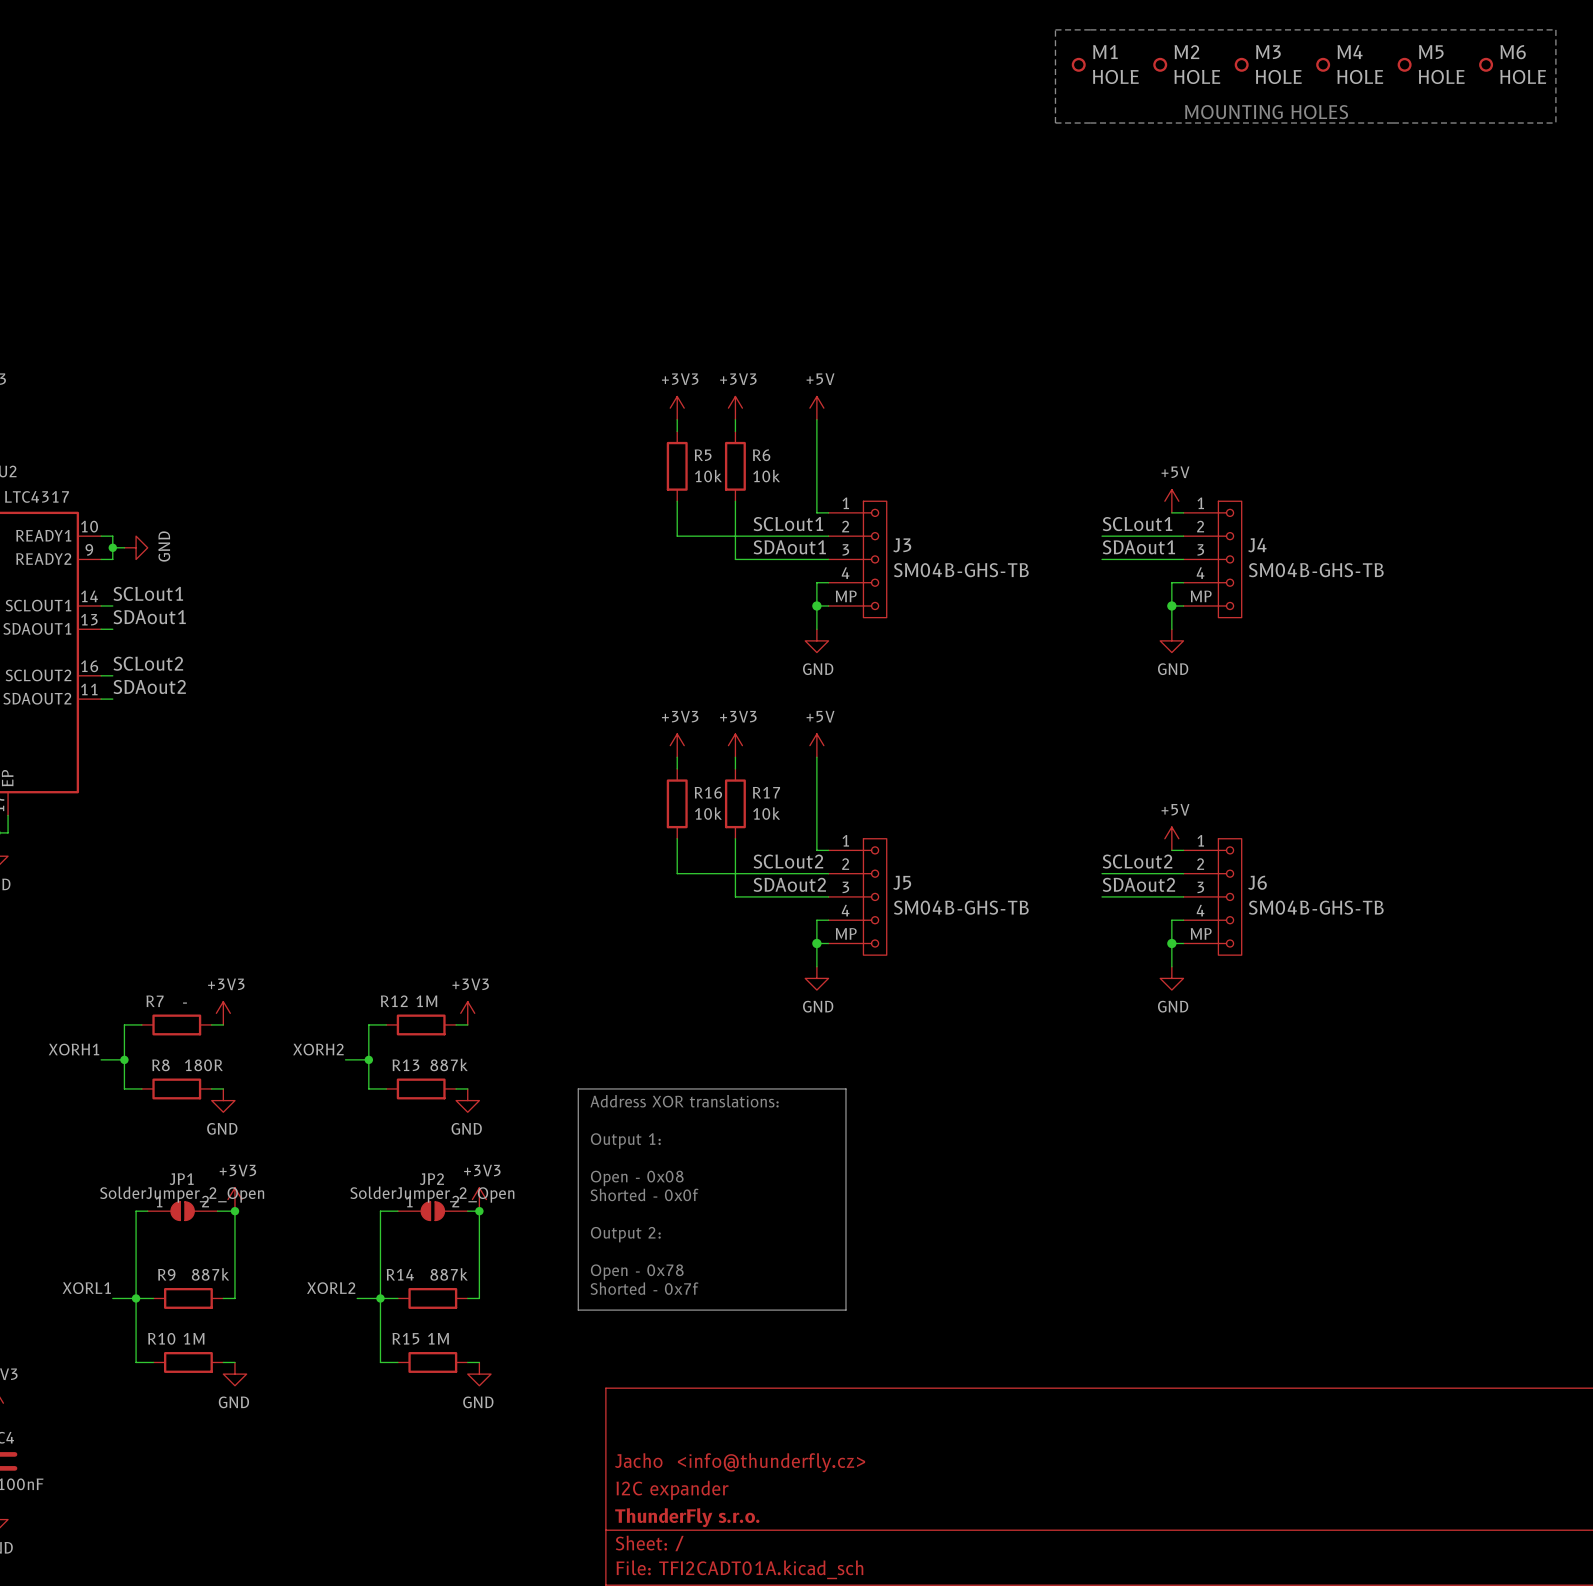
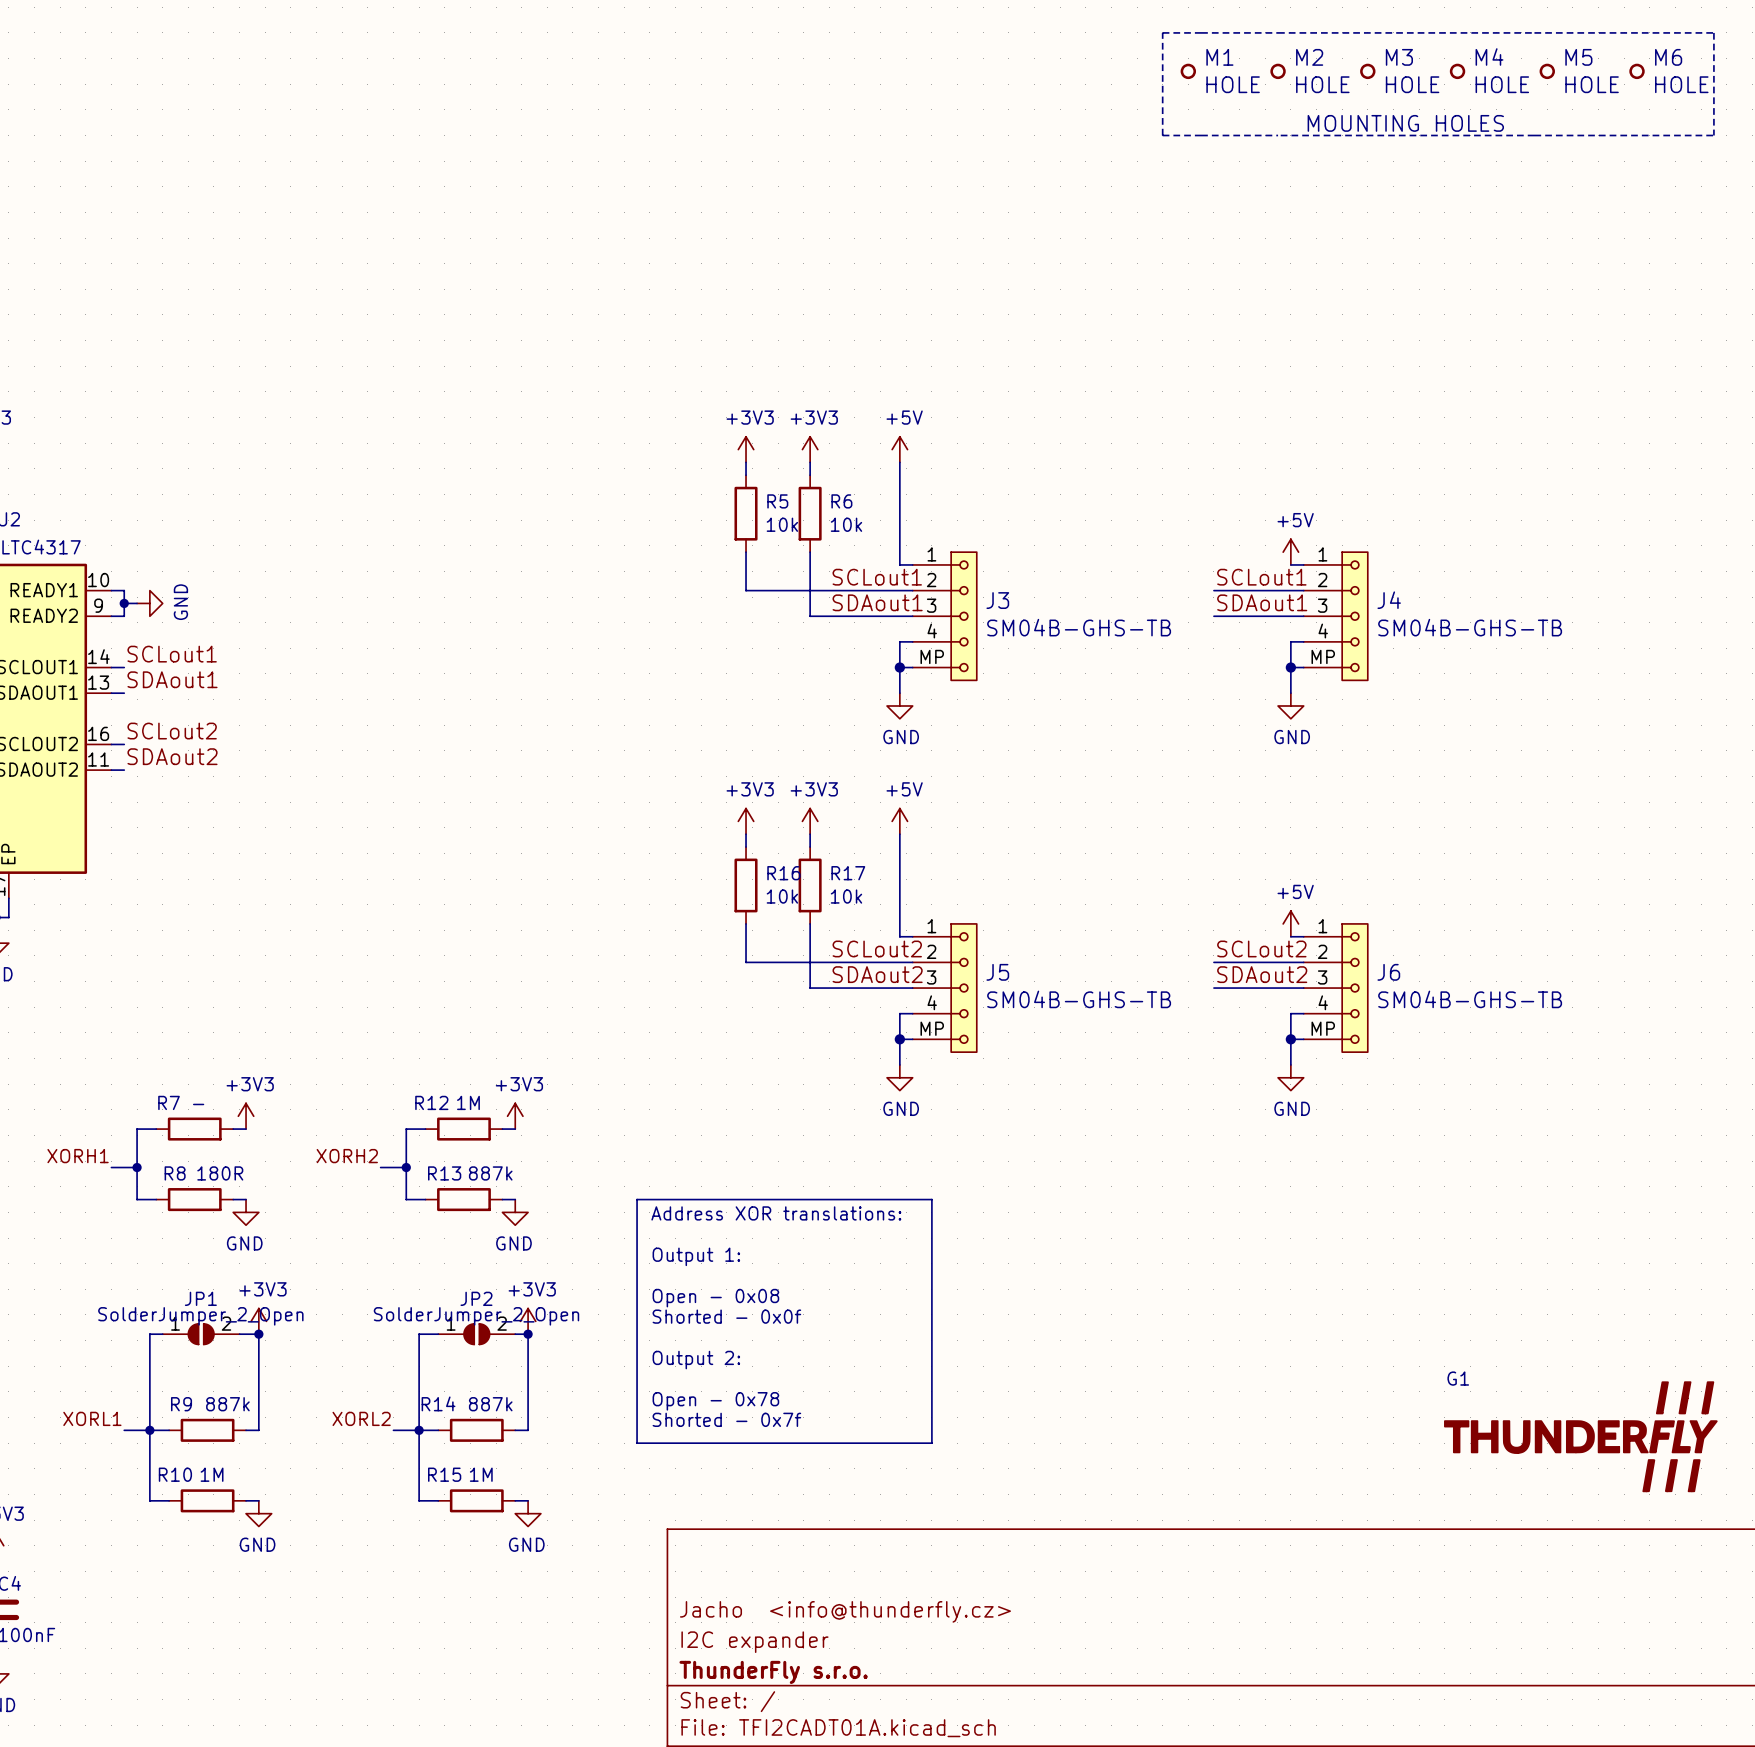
G1: none -> (1580, 1436)

